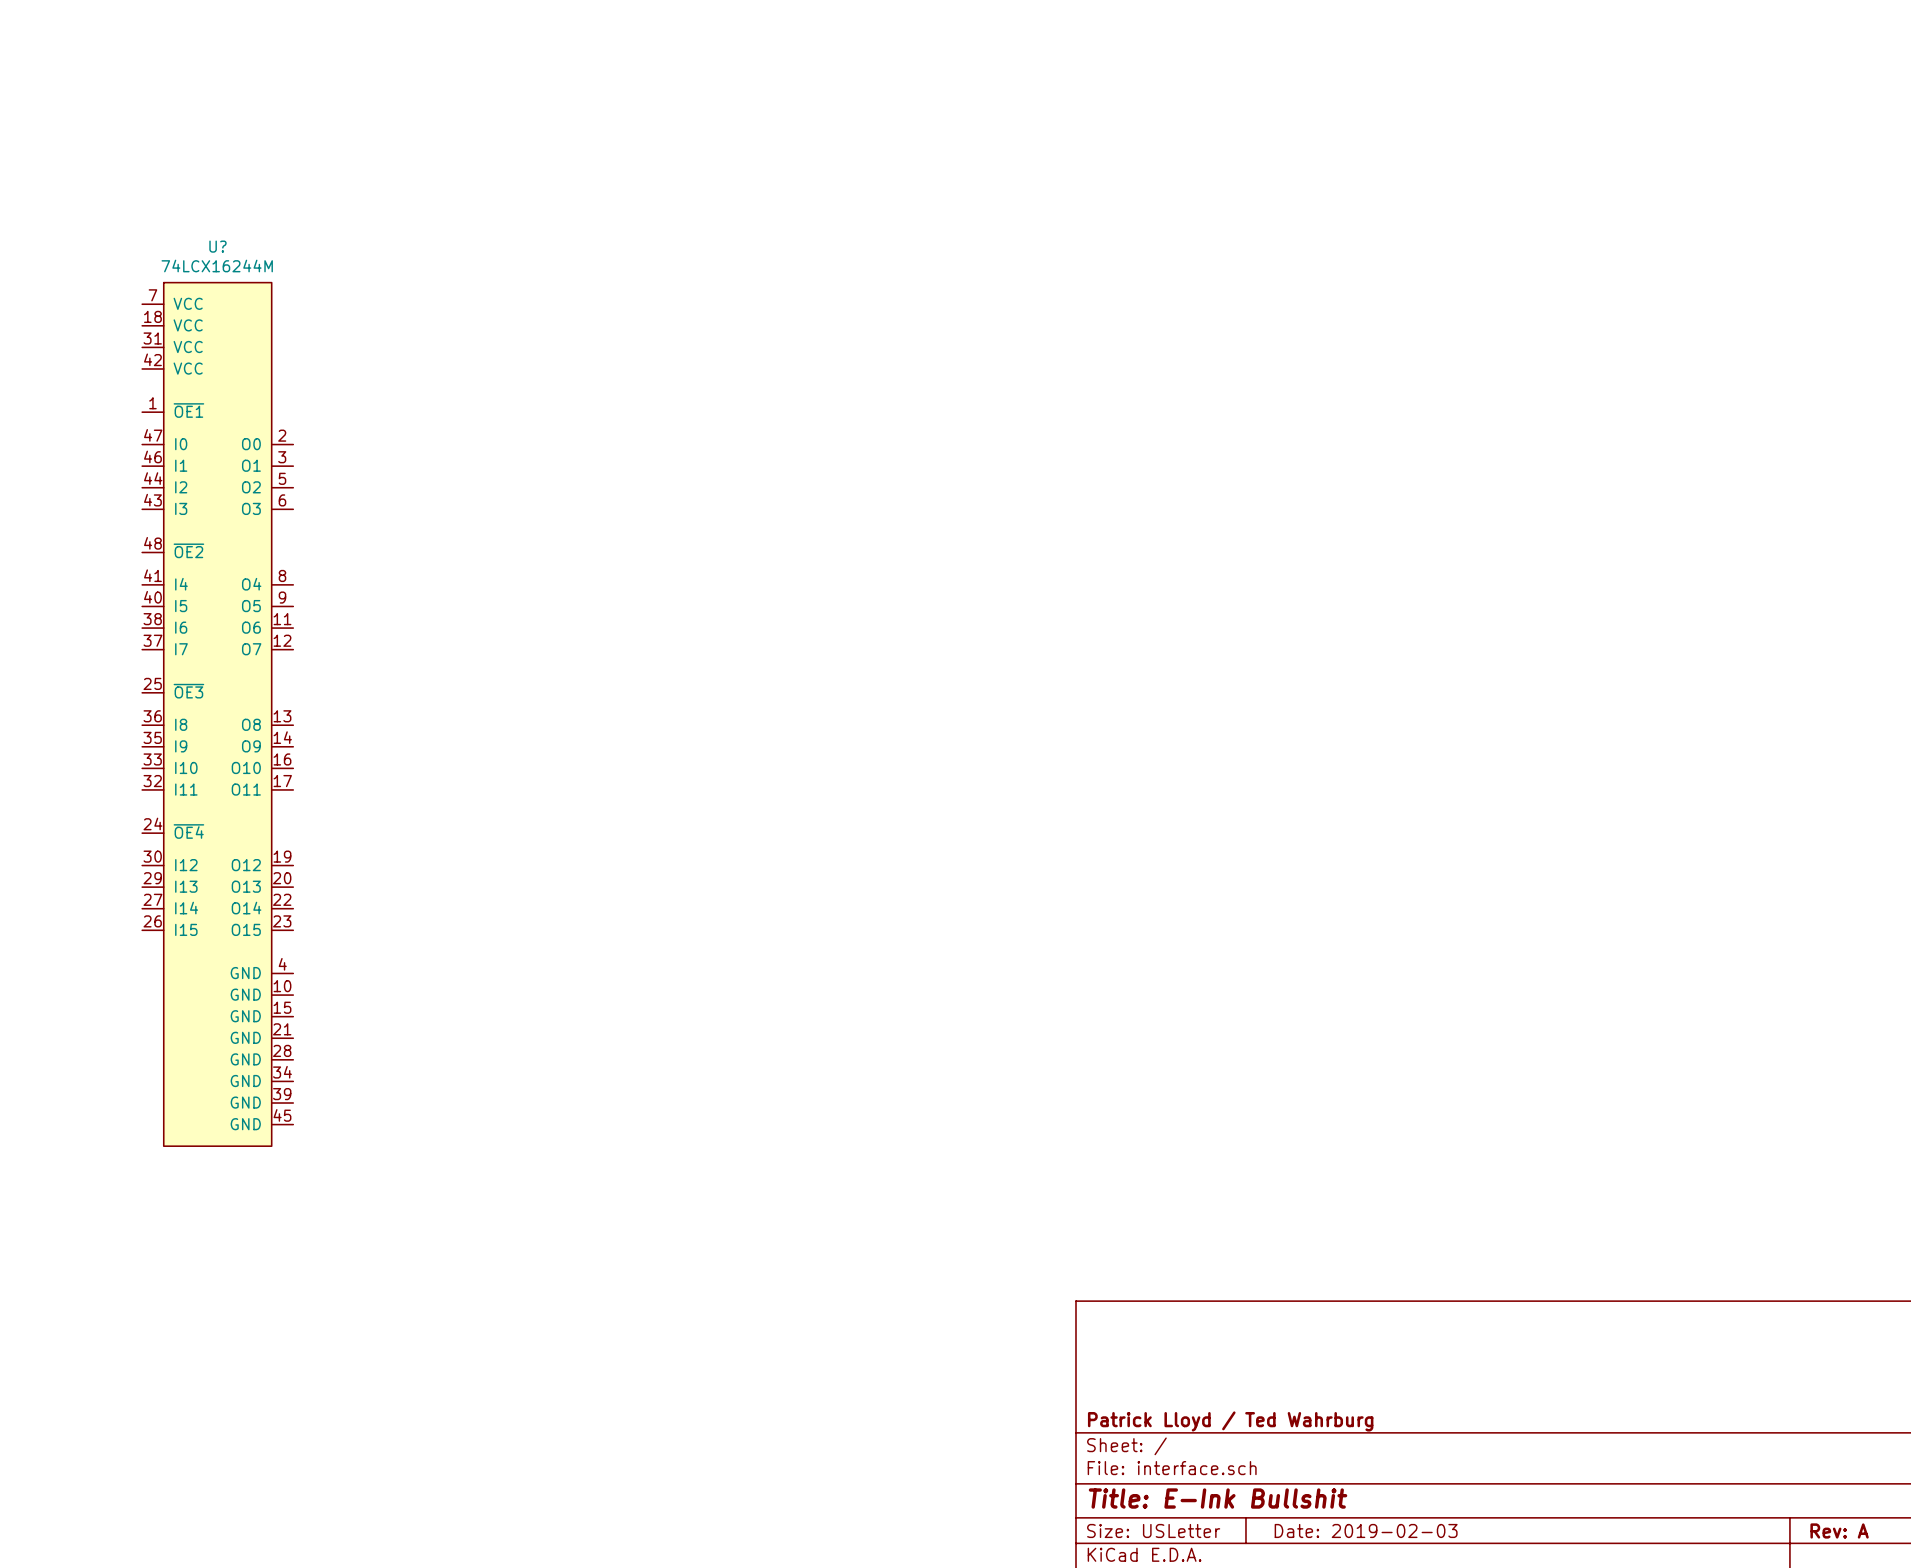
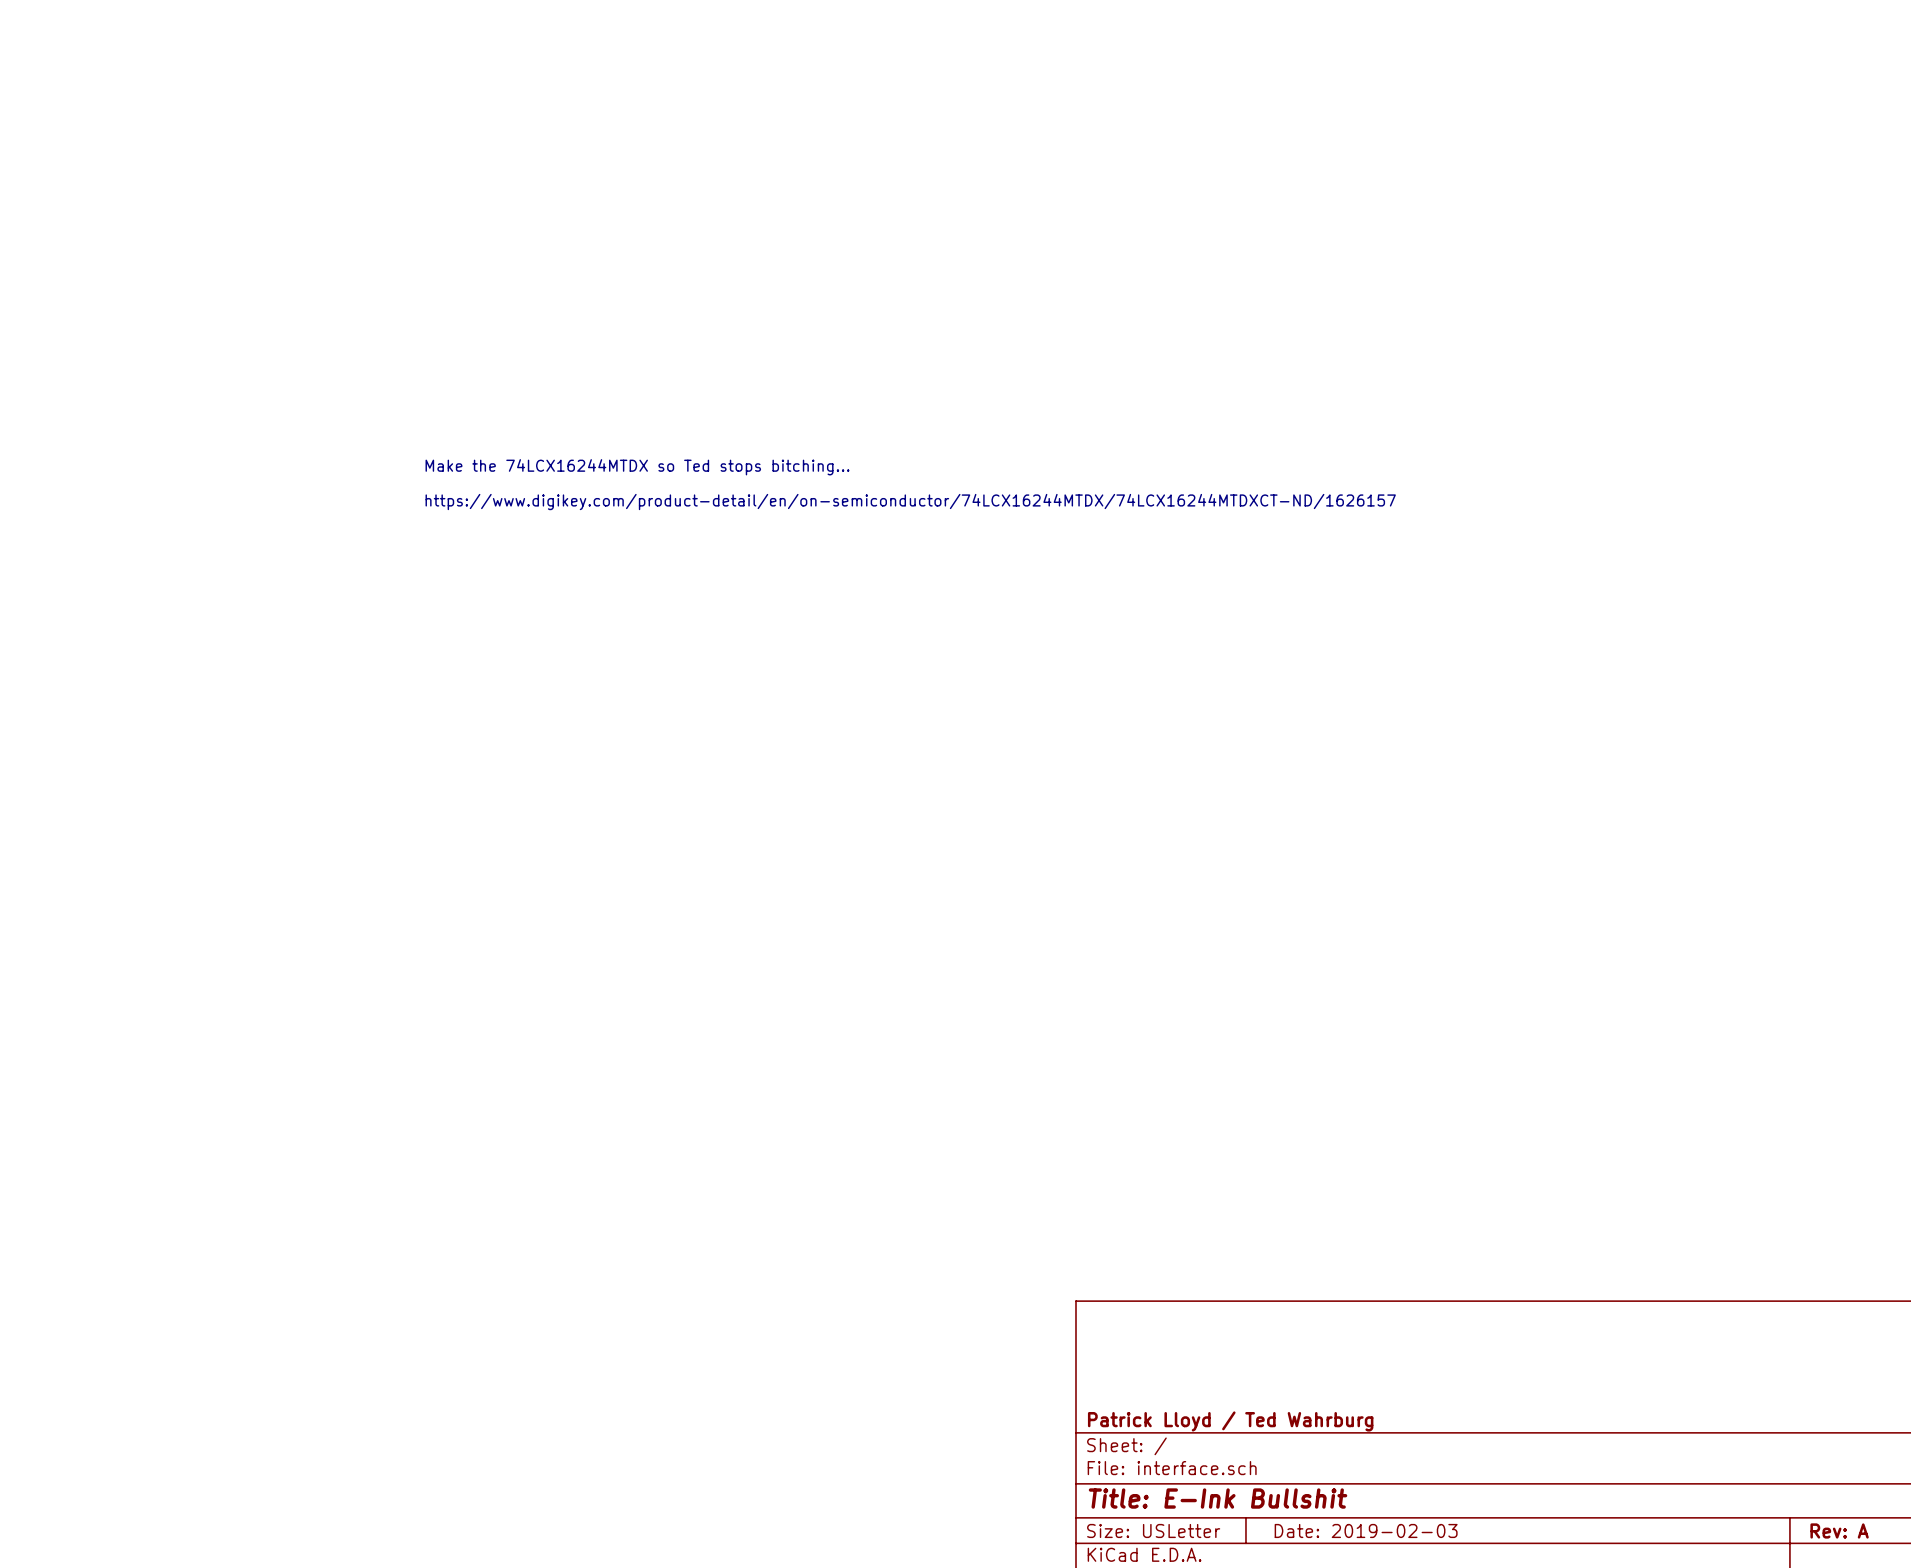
text: none -> Make the 74LCX16244MTDX so Ted stops bitching... (637, 467)
text: none -> https://www.digikey.com/product-detail/en/on-semiconductor/74LCX16244MTDX/74LCX16244MTDXCT-ND/1626157 (910, 502)
U?: 74LCX16244M (217, 714) -> none

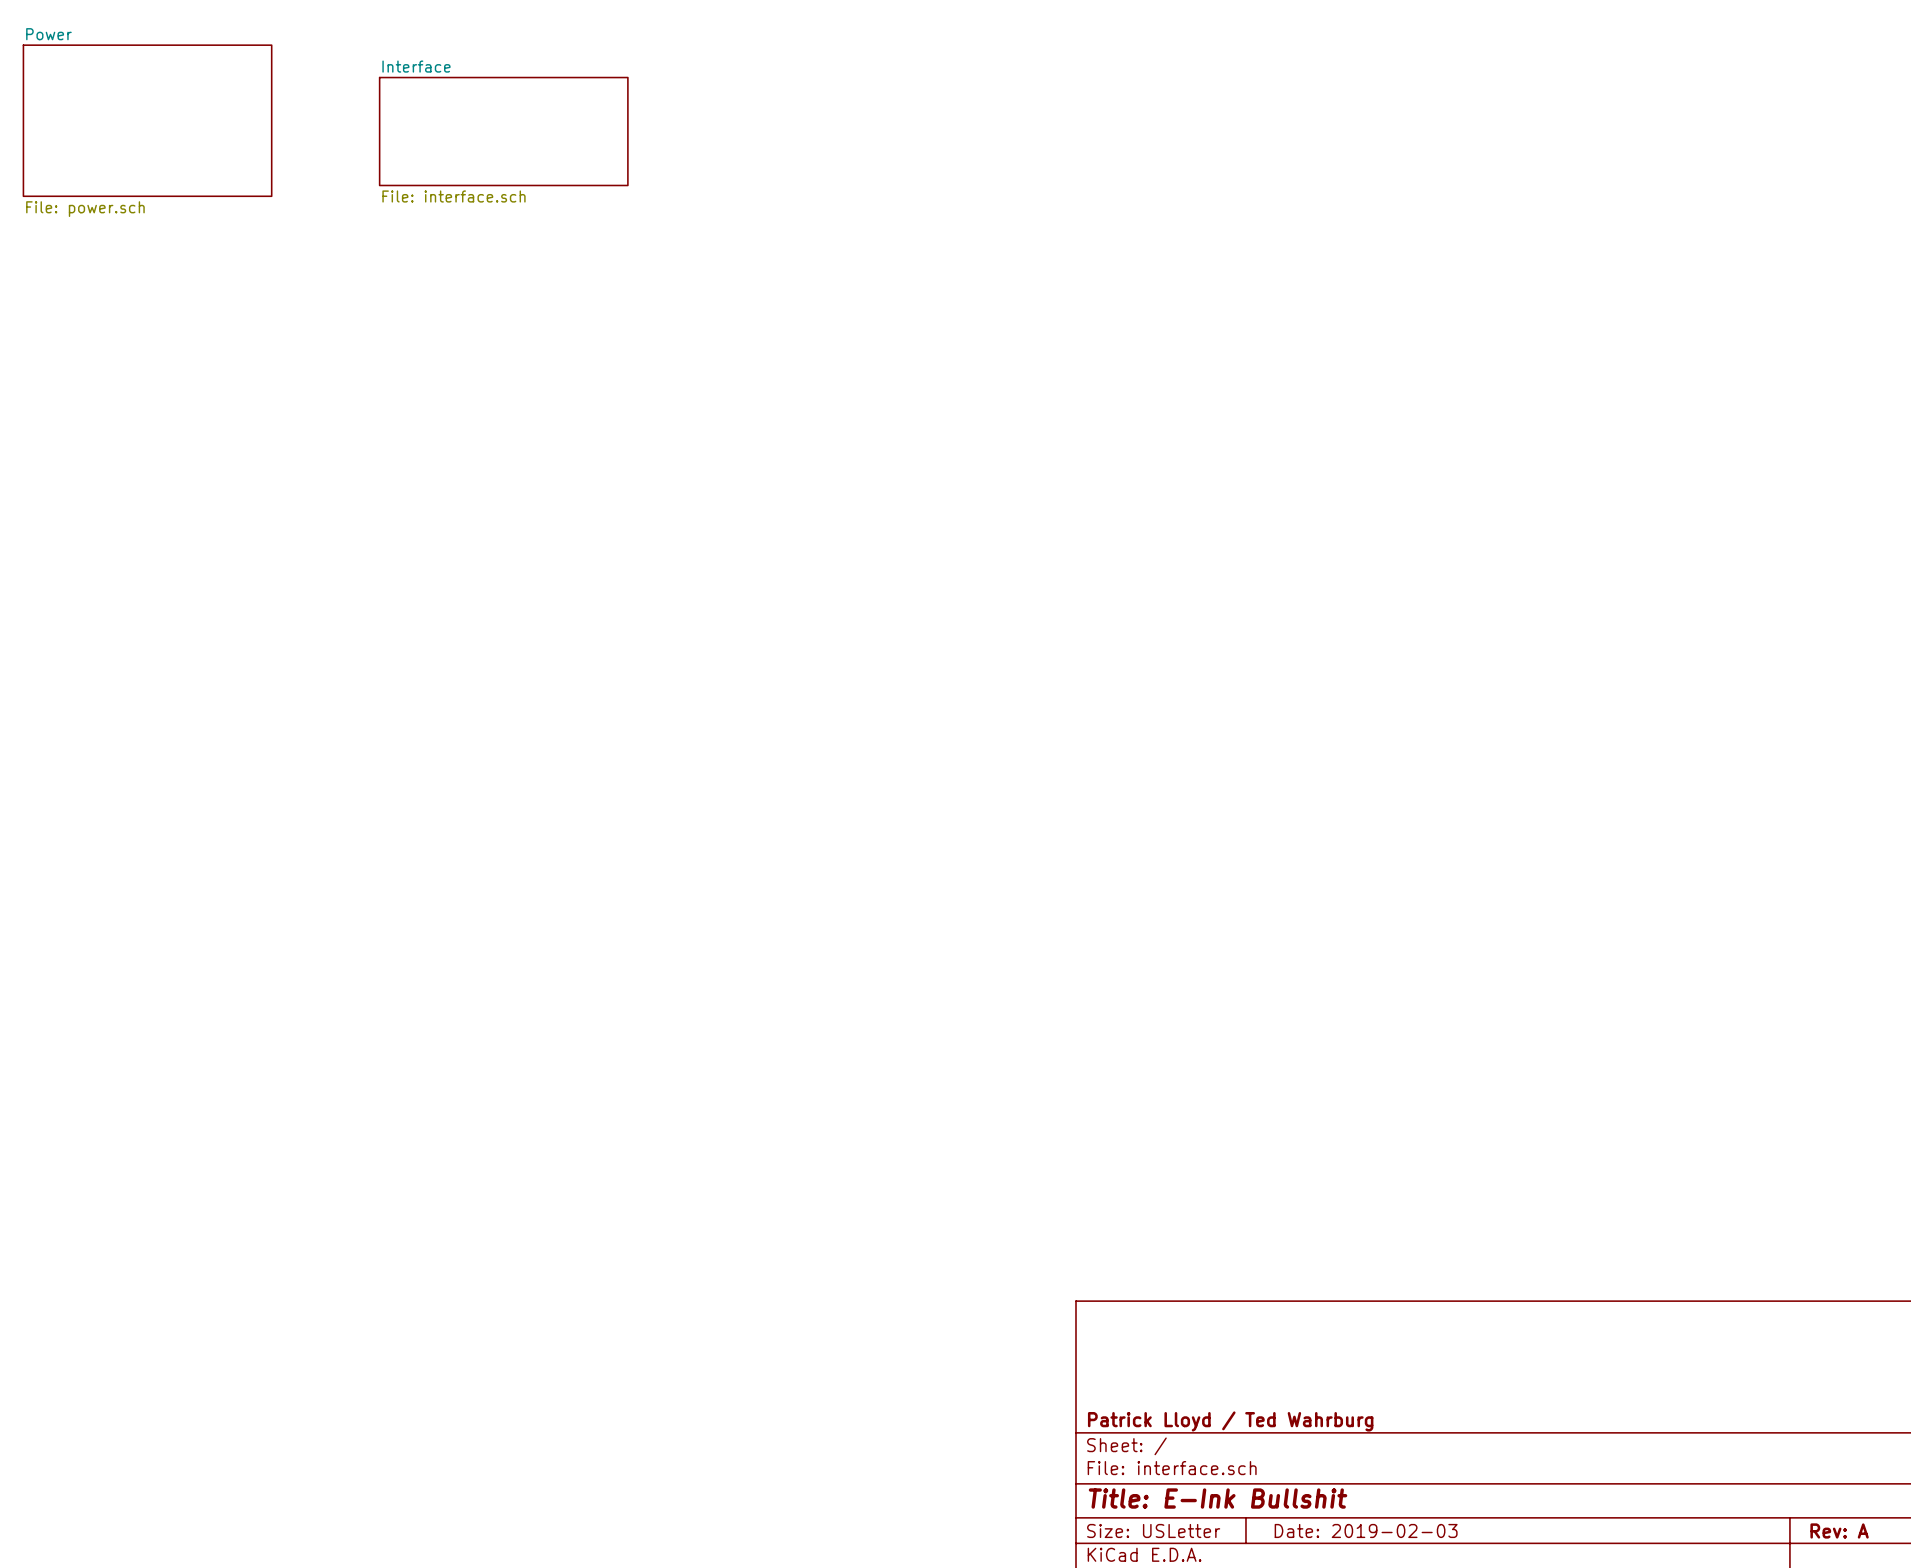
sheet Power: none -> File: power.sch (147, 120)
sheet Interface: none -> File: interface.sch (503, 131)
text: Make the 74LCX16244MTDX so Ted stops bitching... (637, 467) -> none
text: https://www.digikey.com/product-detail/en/on-semiconductor/74LCX16244MTDX/74LCX16244MTDXCT-ND/1626157 (910, 502) -> none

